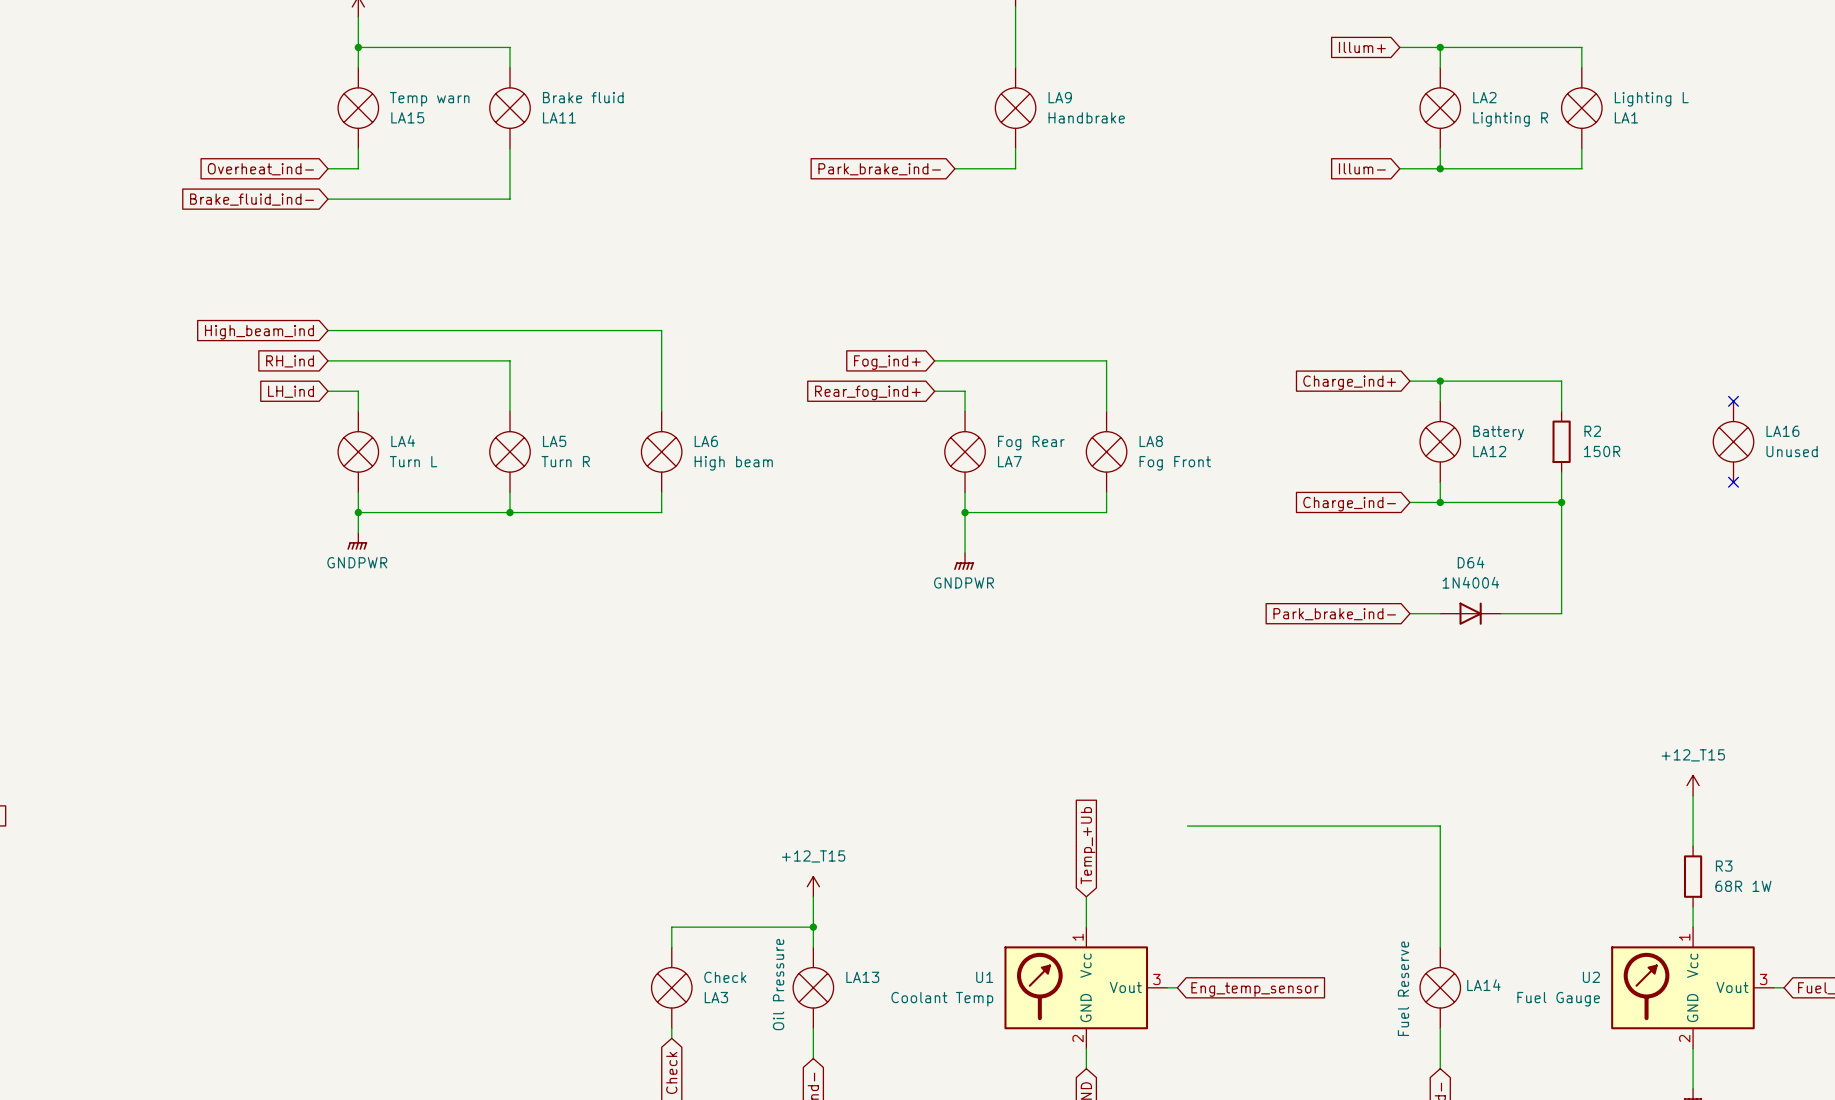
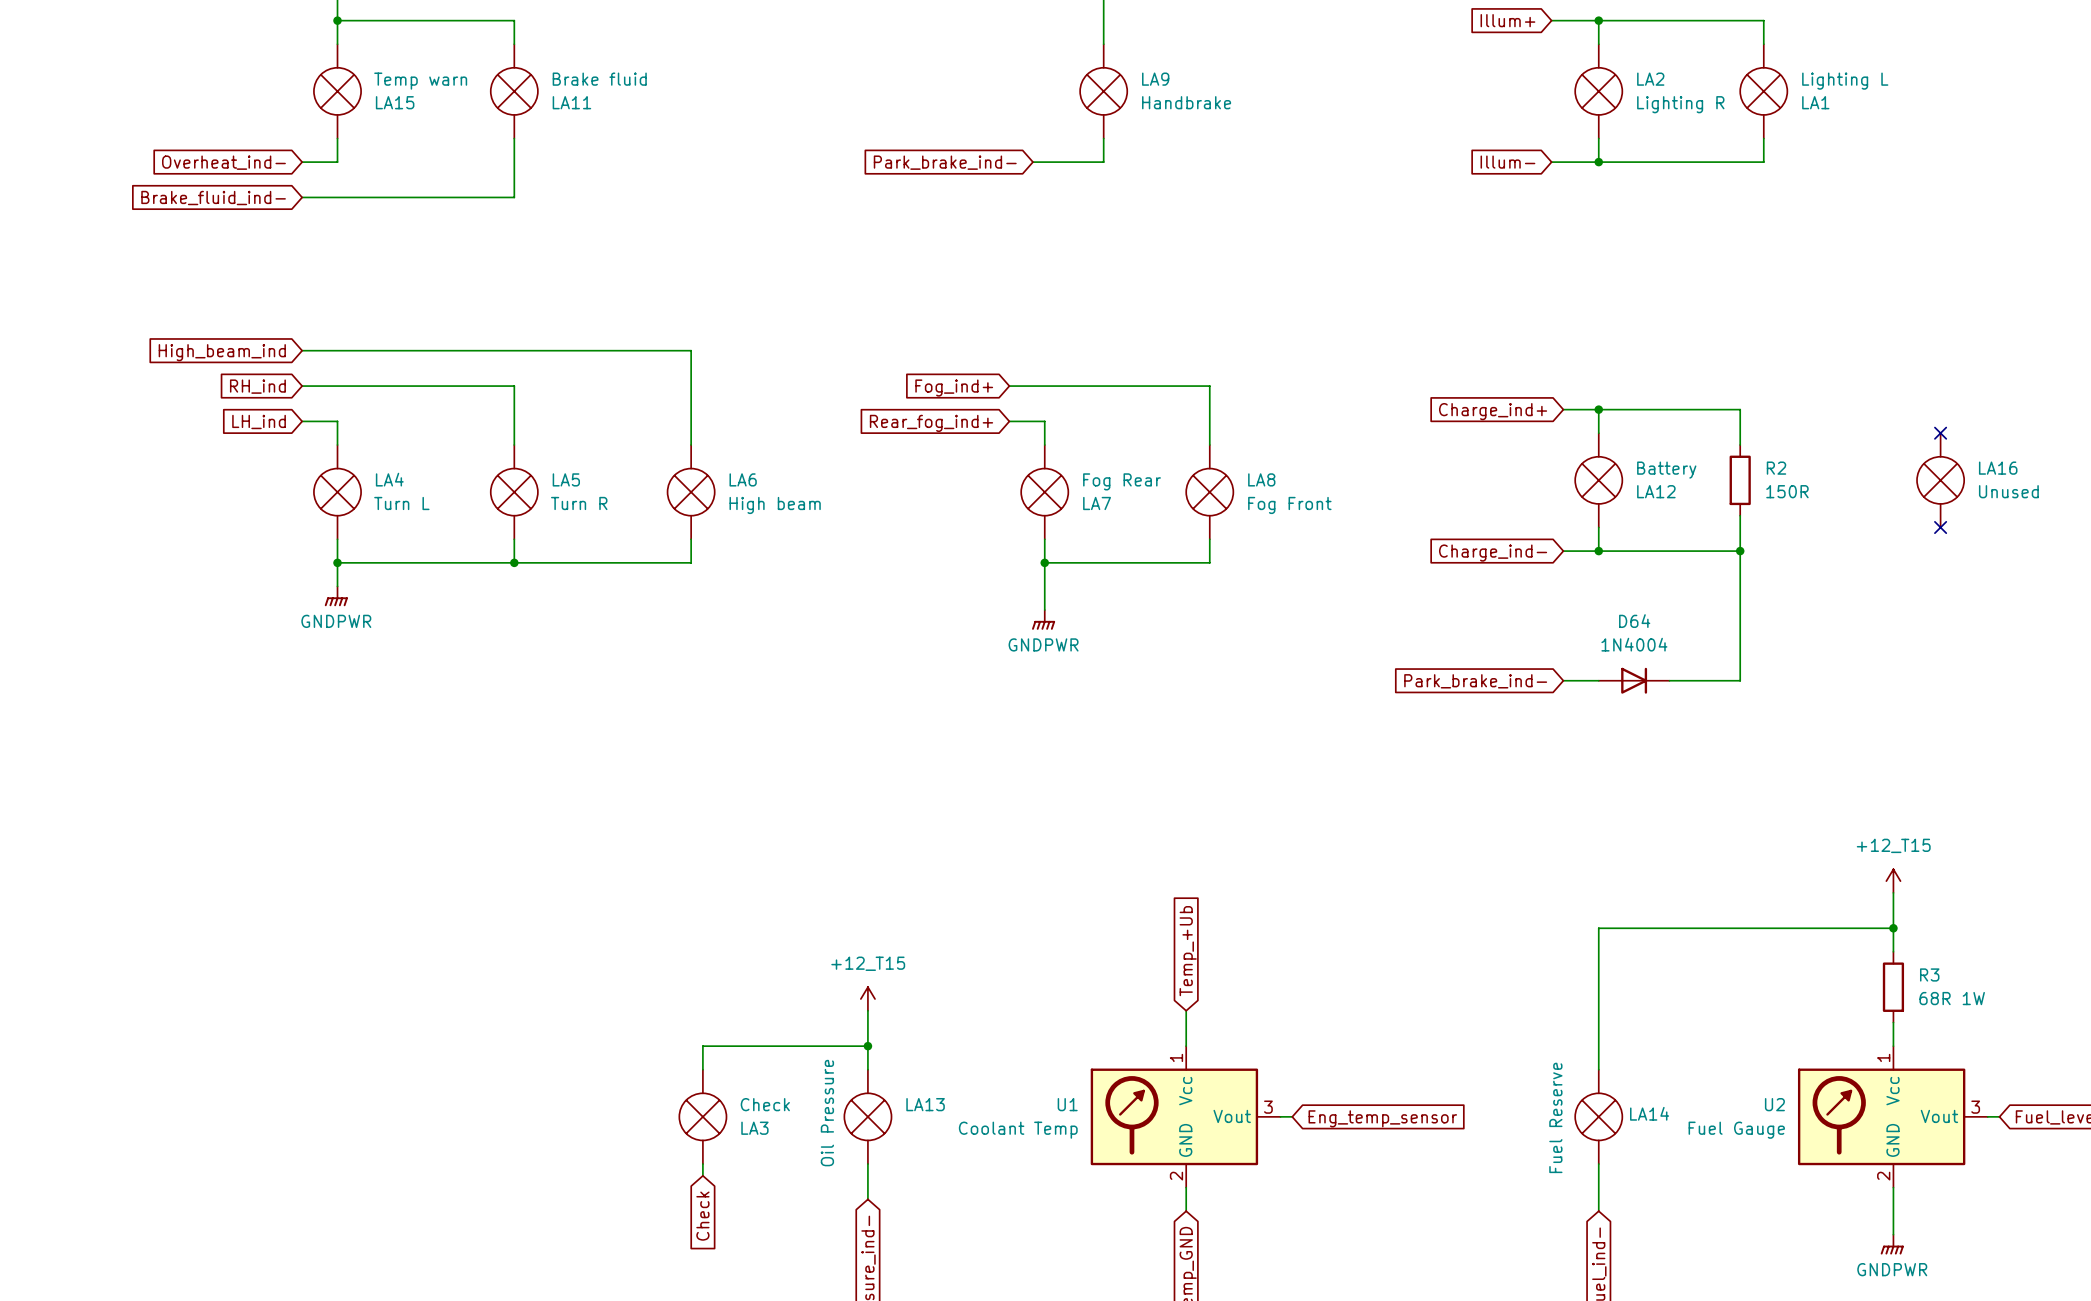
wire: (1187, 826) (1440, 826) -> (1893, 928) (1598, 928)
junction: none -> (1893, 928)

